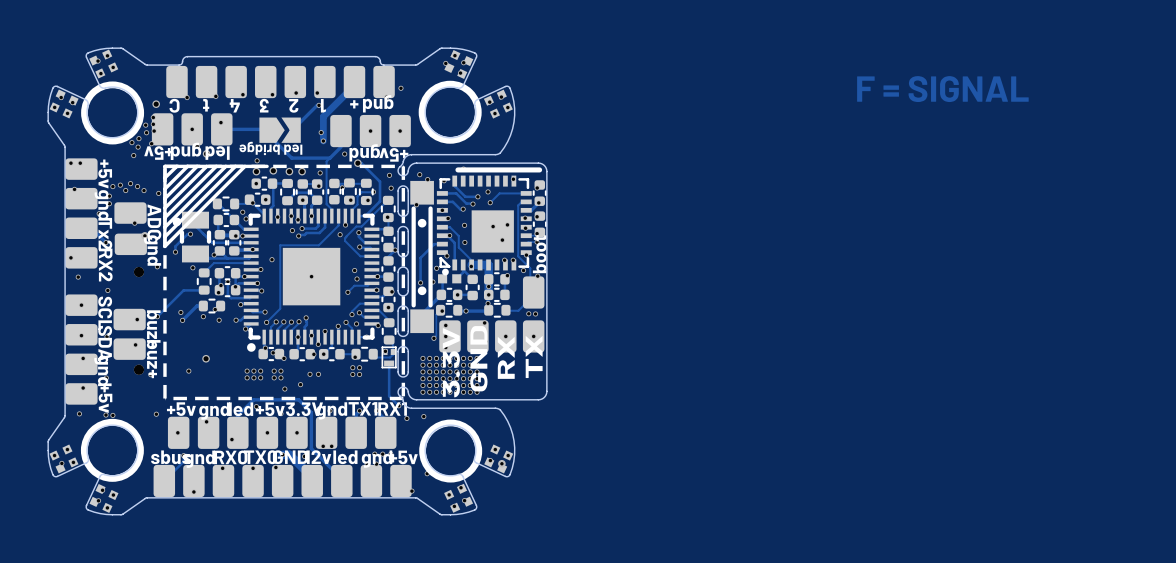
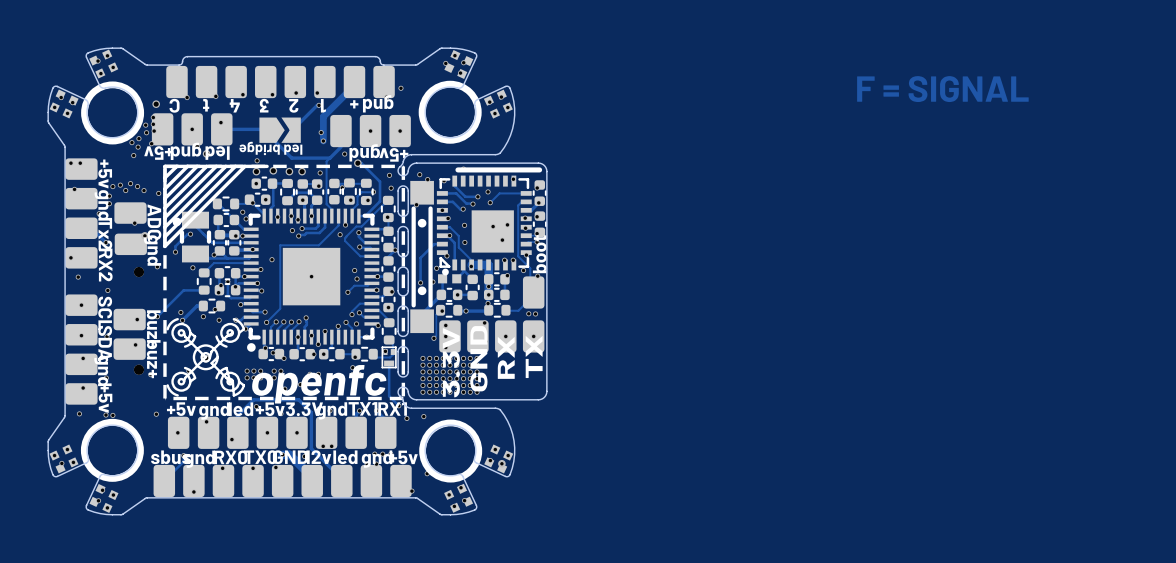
line: none -> (177, 319) (171, 322) (167, 329)
line: none -> (233, 319) (239, 321) (243, 327) (239, 332)
drawing: none -> [171, 322, 241, 392]
line: none -> (184, 332) (185, 336) (205, 357) (185, 377) (184, 381)
line: none -> (190, 332) (195, 336) (194, 338) (185, 346)
line: none -> (232, 332) (211, 351) (209, 357)
line: none -> (216, 336) (220, 342) (226, 346)
line: none -> (217, 357) (211, 363) (230, 381) (226, 368) (223, 369) (221, 370) (220, 371) (216, 378)
line: none -> (185, 368) (194, 376) (195, 378) (190, 381)
line: none -> (232, 381) (233, 395) (240, 391) (243, 386) (239, 381)
text: none -> openfc (319, 384)
line: none -> (167, 385) (171, 391) (177, 395)

